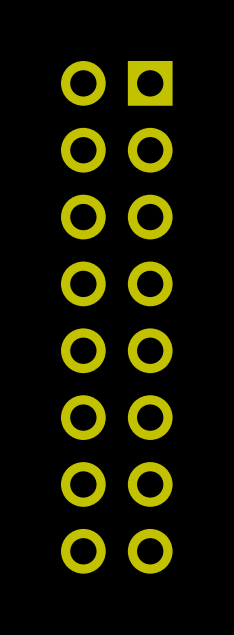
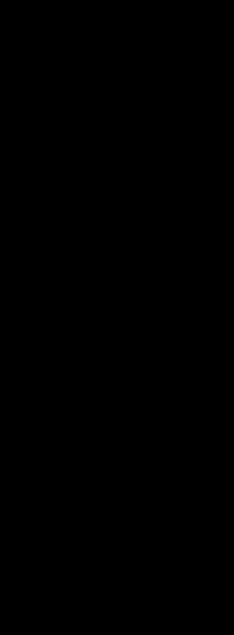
part: (116, 317) -> none

